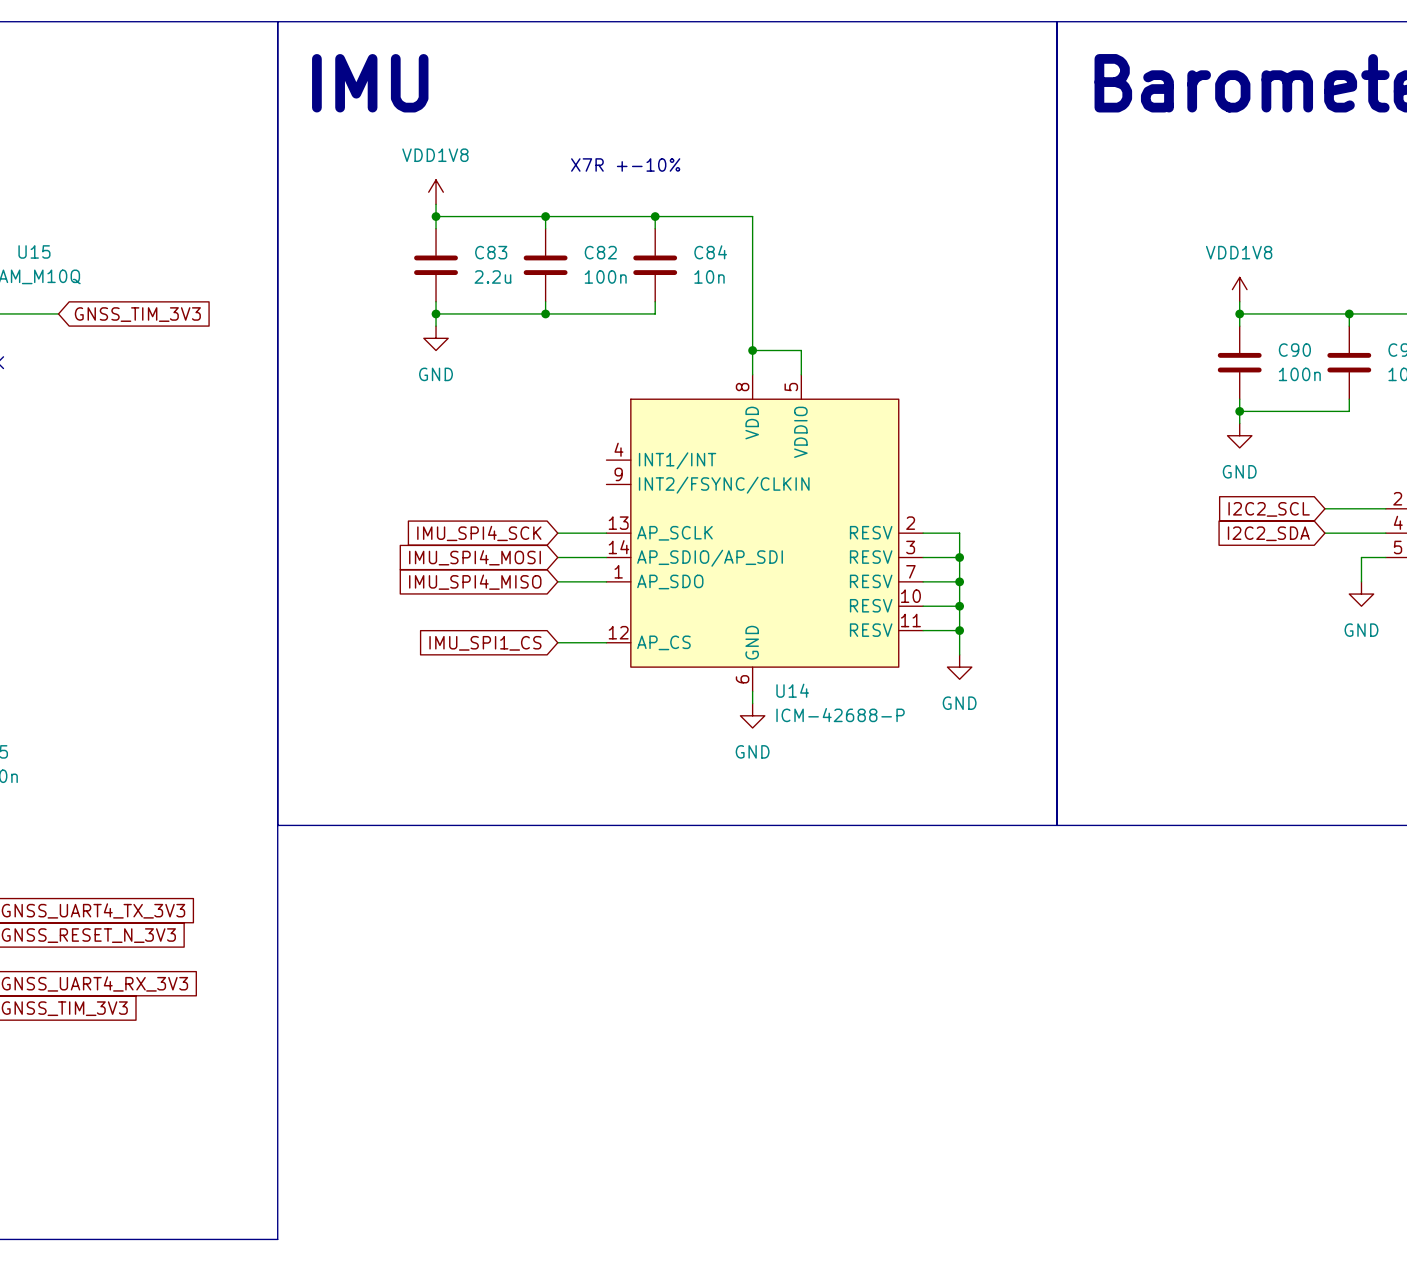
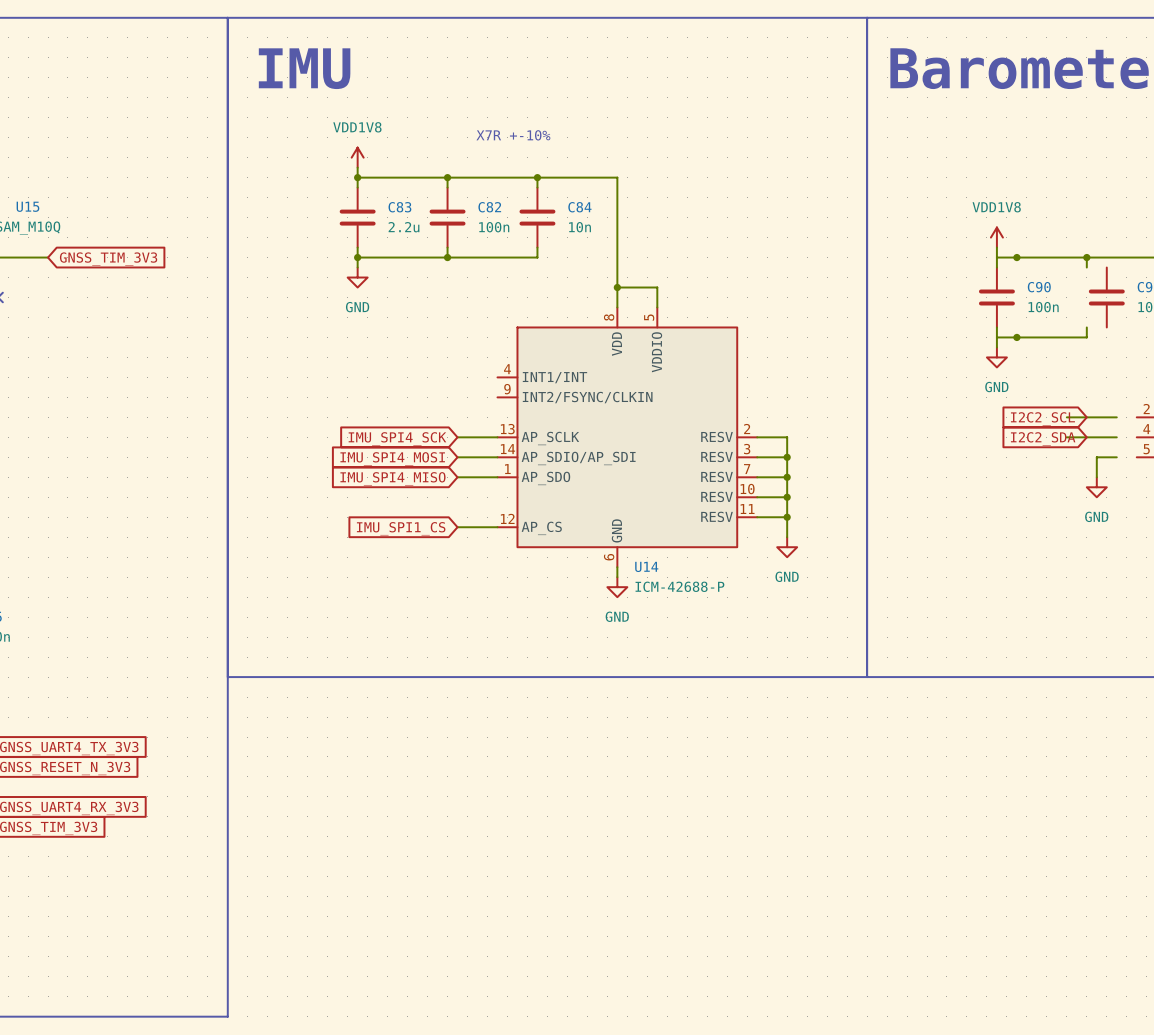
power symbol position: VDD1V8 (1239, 289) -> VDD1V8 (996, 237)
wire: (1239, 301) (1239, 326) -> (996, 247) (996, 267)
wire: none -> (996, 257) (1016, 257)
wire: (1349, 313) (1349, 326) -> (1086, 257) (1086, 267)
junction position: (1349, 313) -> (1086, 257)
C90 position: (1239, 362) -> (996, 297)
wire: (1239, 399) (1239, 423) -> (996, 327) (996, 347)
wire: (1349, 399) (1349, 411) (1324, 411) -> (1086, 327) (1086, 337)
wire: none -> (996, 337) (1016, 337)
power symbol position: GND (1239, 435) -> GND (996, 357)
wire: (1361, 508) (1385, 508) -> (1066, 417) (1086, 417)
wire: (1361, 533) (1385, 533) -> (1066, 437) (1086, 437)
wire: (1385, 557) (1361, 557) (1361, 581) -> (1116, 457) (1096, 457) (1096, 477)
power symbol position: GND (1361, 594) -> GND (1096, 487)

